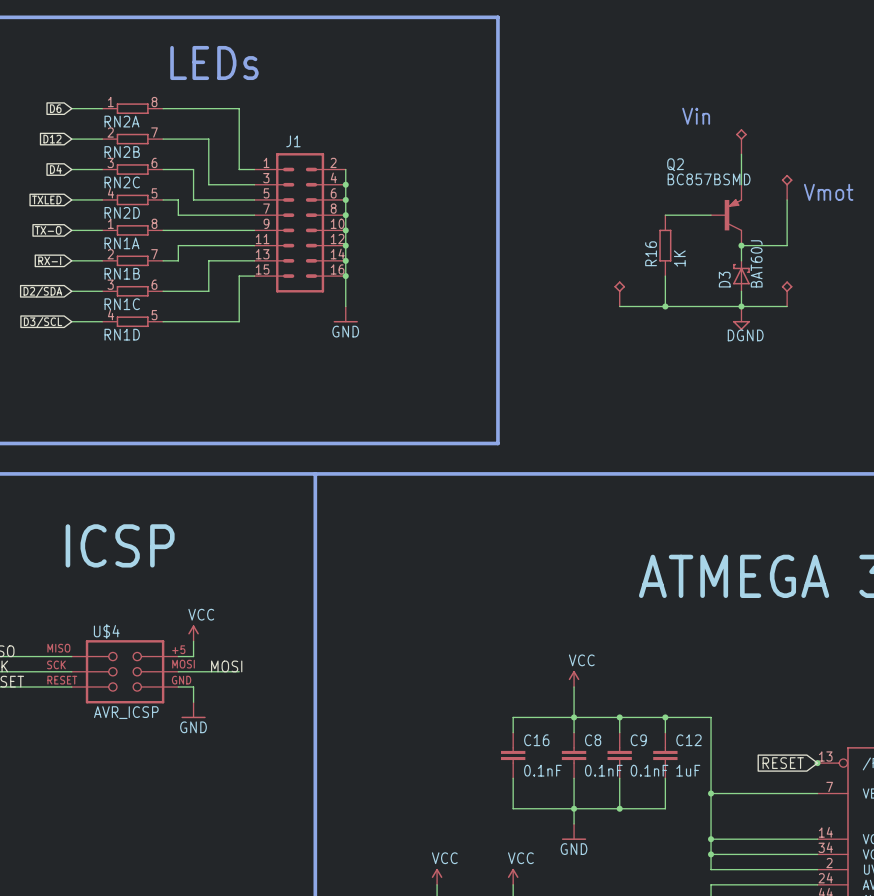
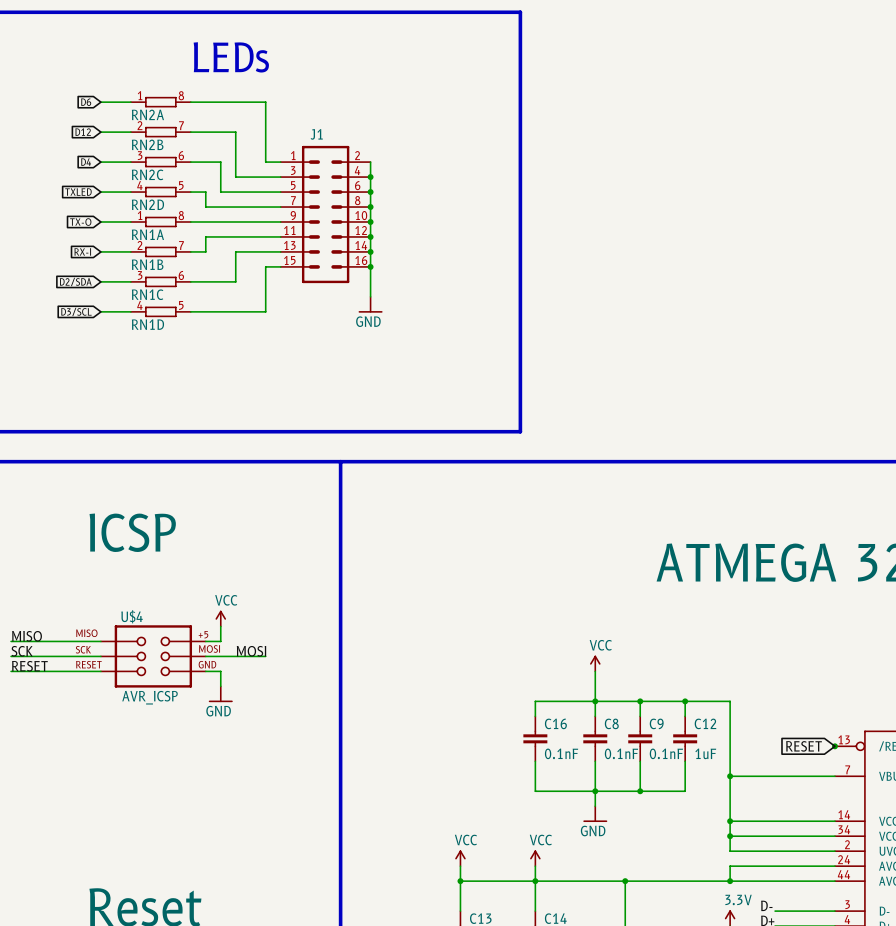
text: Vin (696, 116) -> none
part: (741, 141) -> none
wire: (741, 154) (741, 184) -> none
part: (787, 187) -> none
text: Vmot (828, 192) -> none
wire: (787, 199) (787, 245) (741, 245) (741, 260) -> none
wire: (665, 215) (711, 215) -> none
Q2: BC857BSMD (726, 215) -> none
R16: 1K (665, 245) -> none
junction: (741, 245) -> none
wire: (665, 276) (665, 306) -> none
D3: BAT60J (741, 276) -> none
wire: (741, 291) (741, 306) -> none
part: (619, 293) -> none
part: (787, 293) -> none
wire: (619, 306) (787, 306) -> none
junction: (665, 306) -> none
junction: (741, 306) -> none
power symbol: DGND (741, 318) -> none

